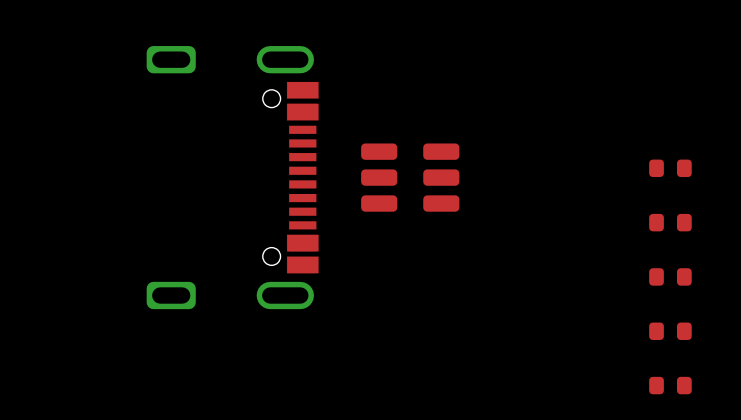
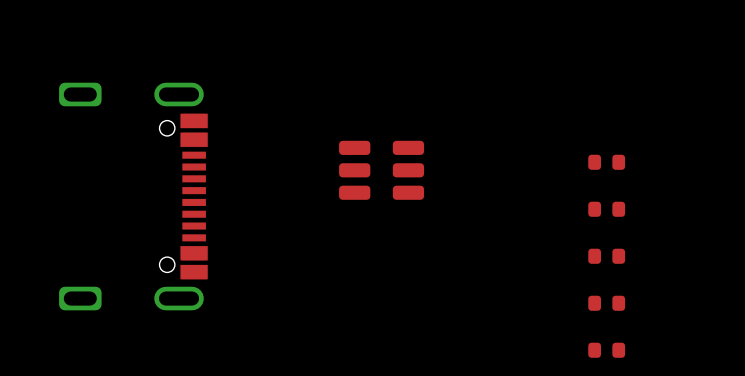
part position: (232, 177) -> (133, 196)

